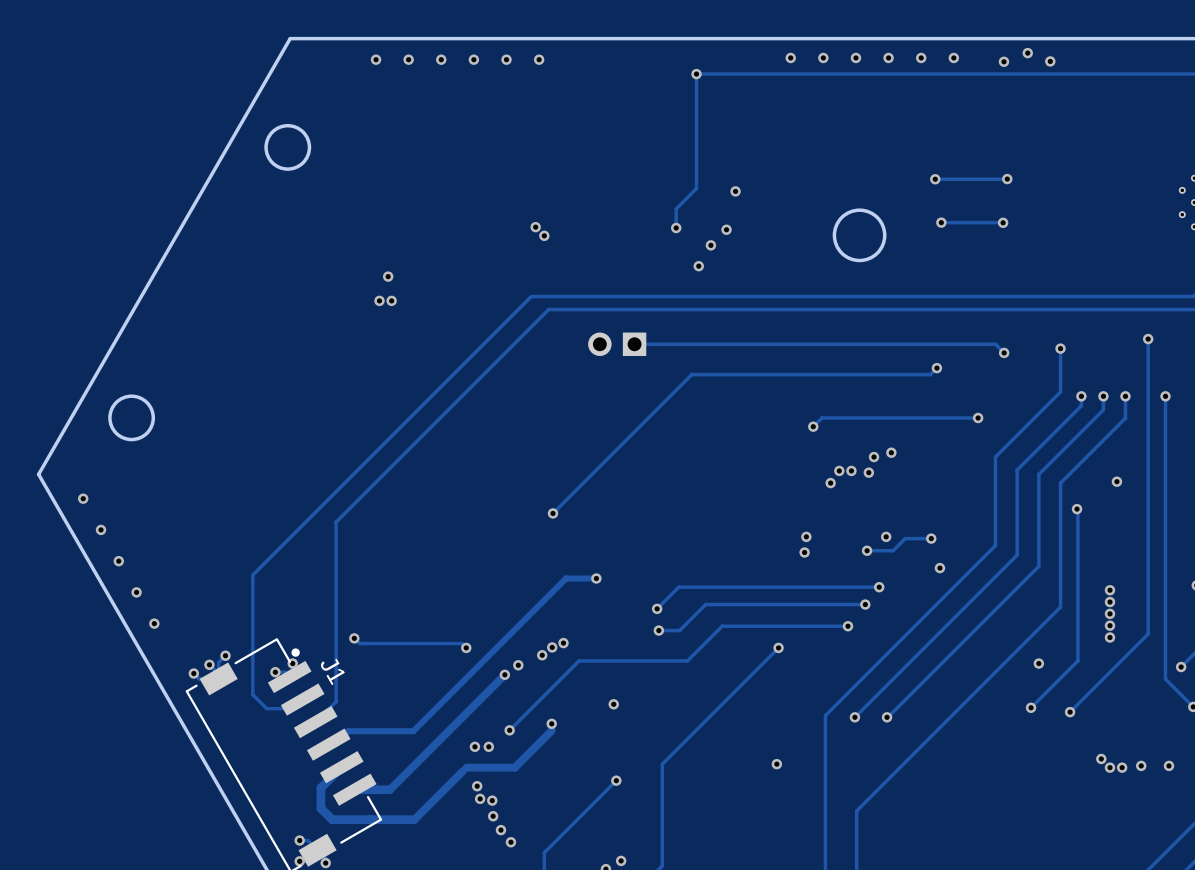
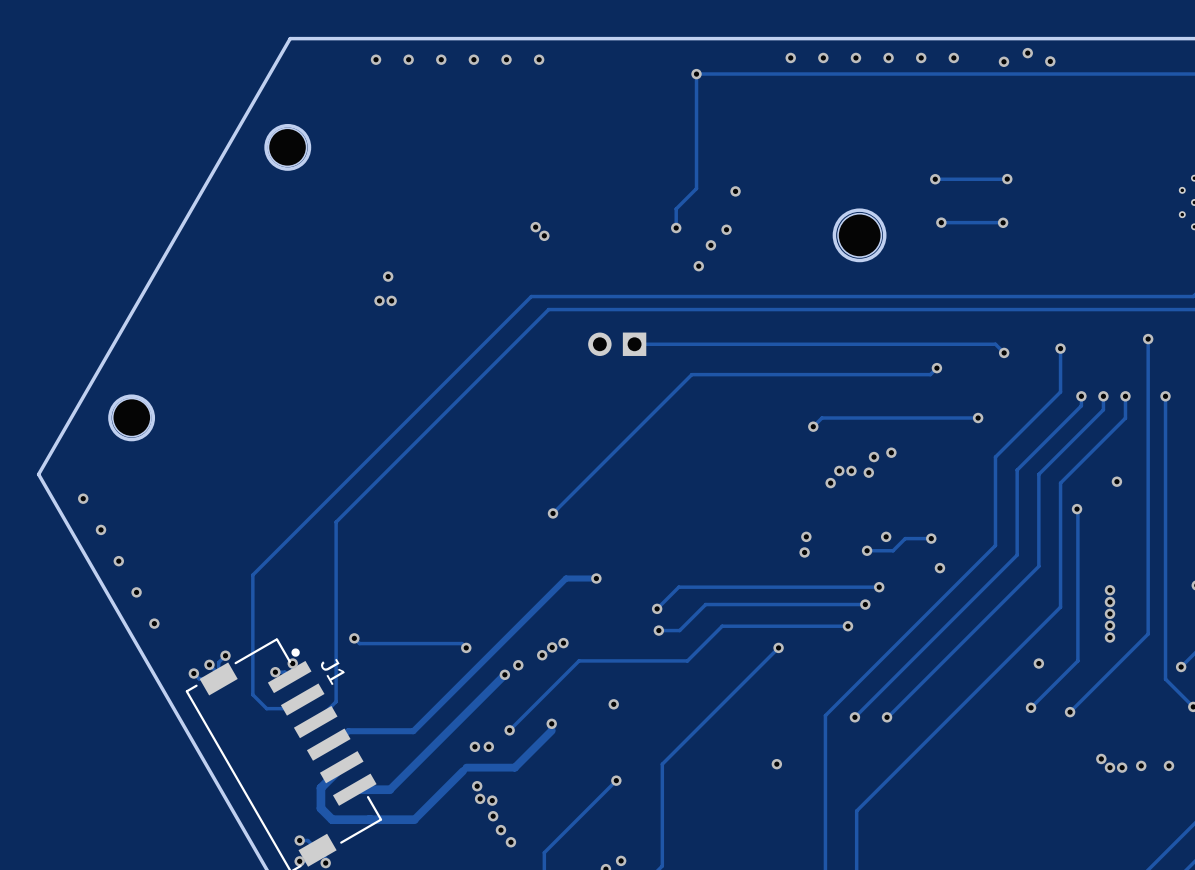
part: none -> (287, 147)
part: none -> (859, 235)
part: none -> (131, 417)

